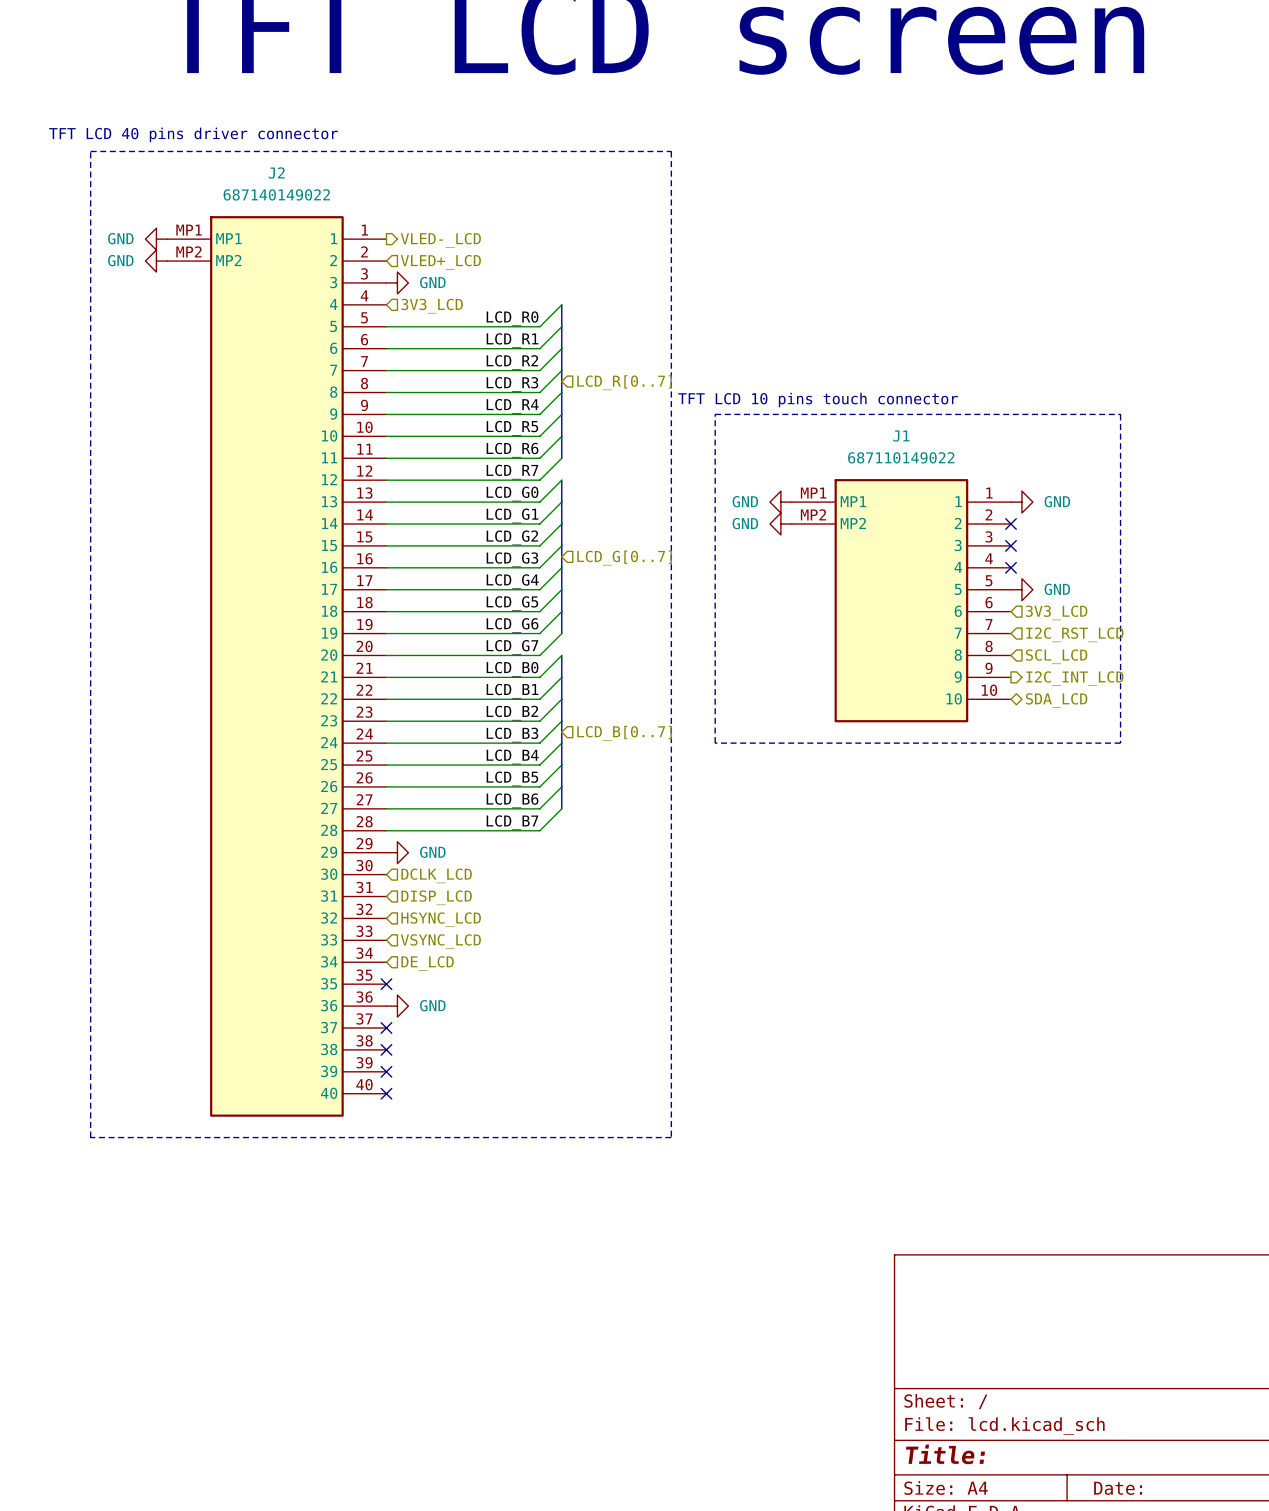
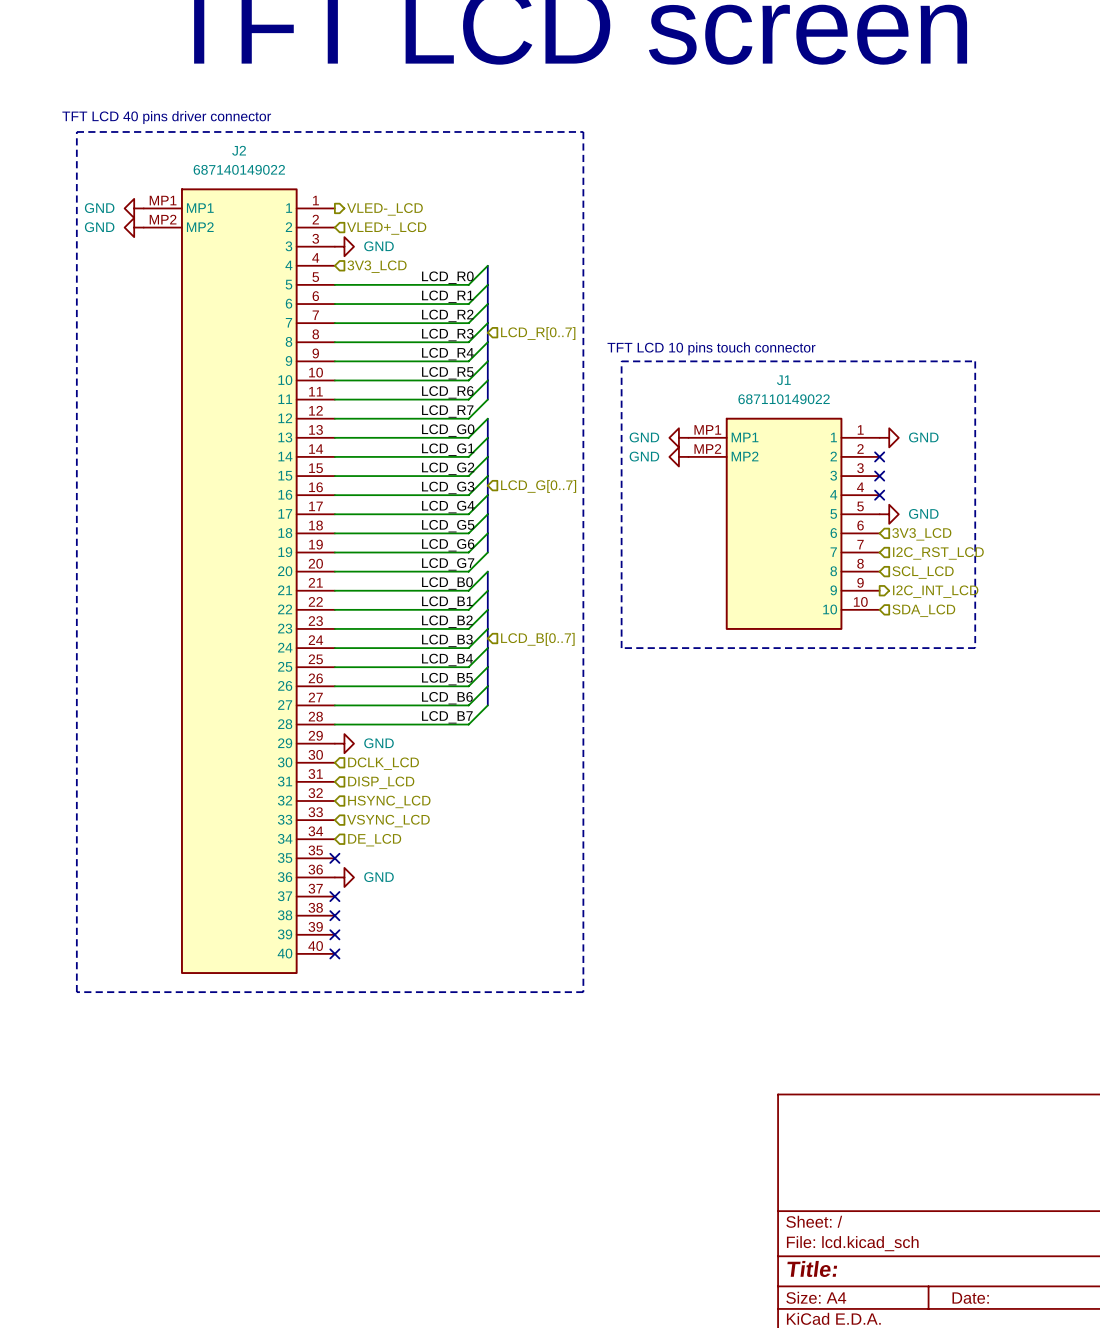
hierarchical label shape: bidirectional (1056, 700) -> input (923, 610)

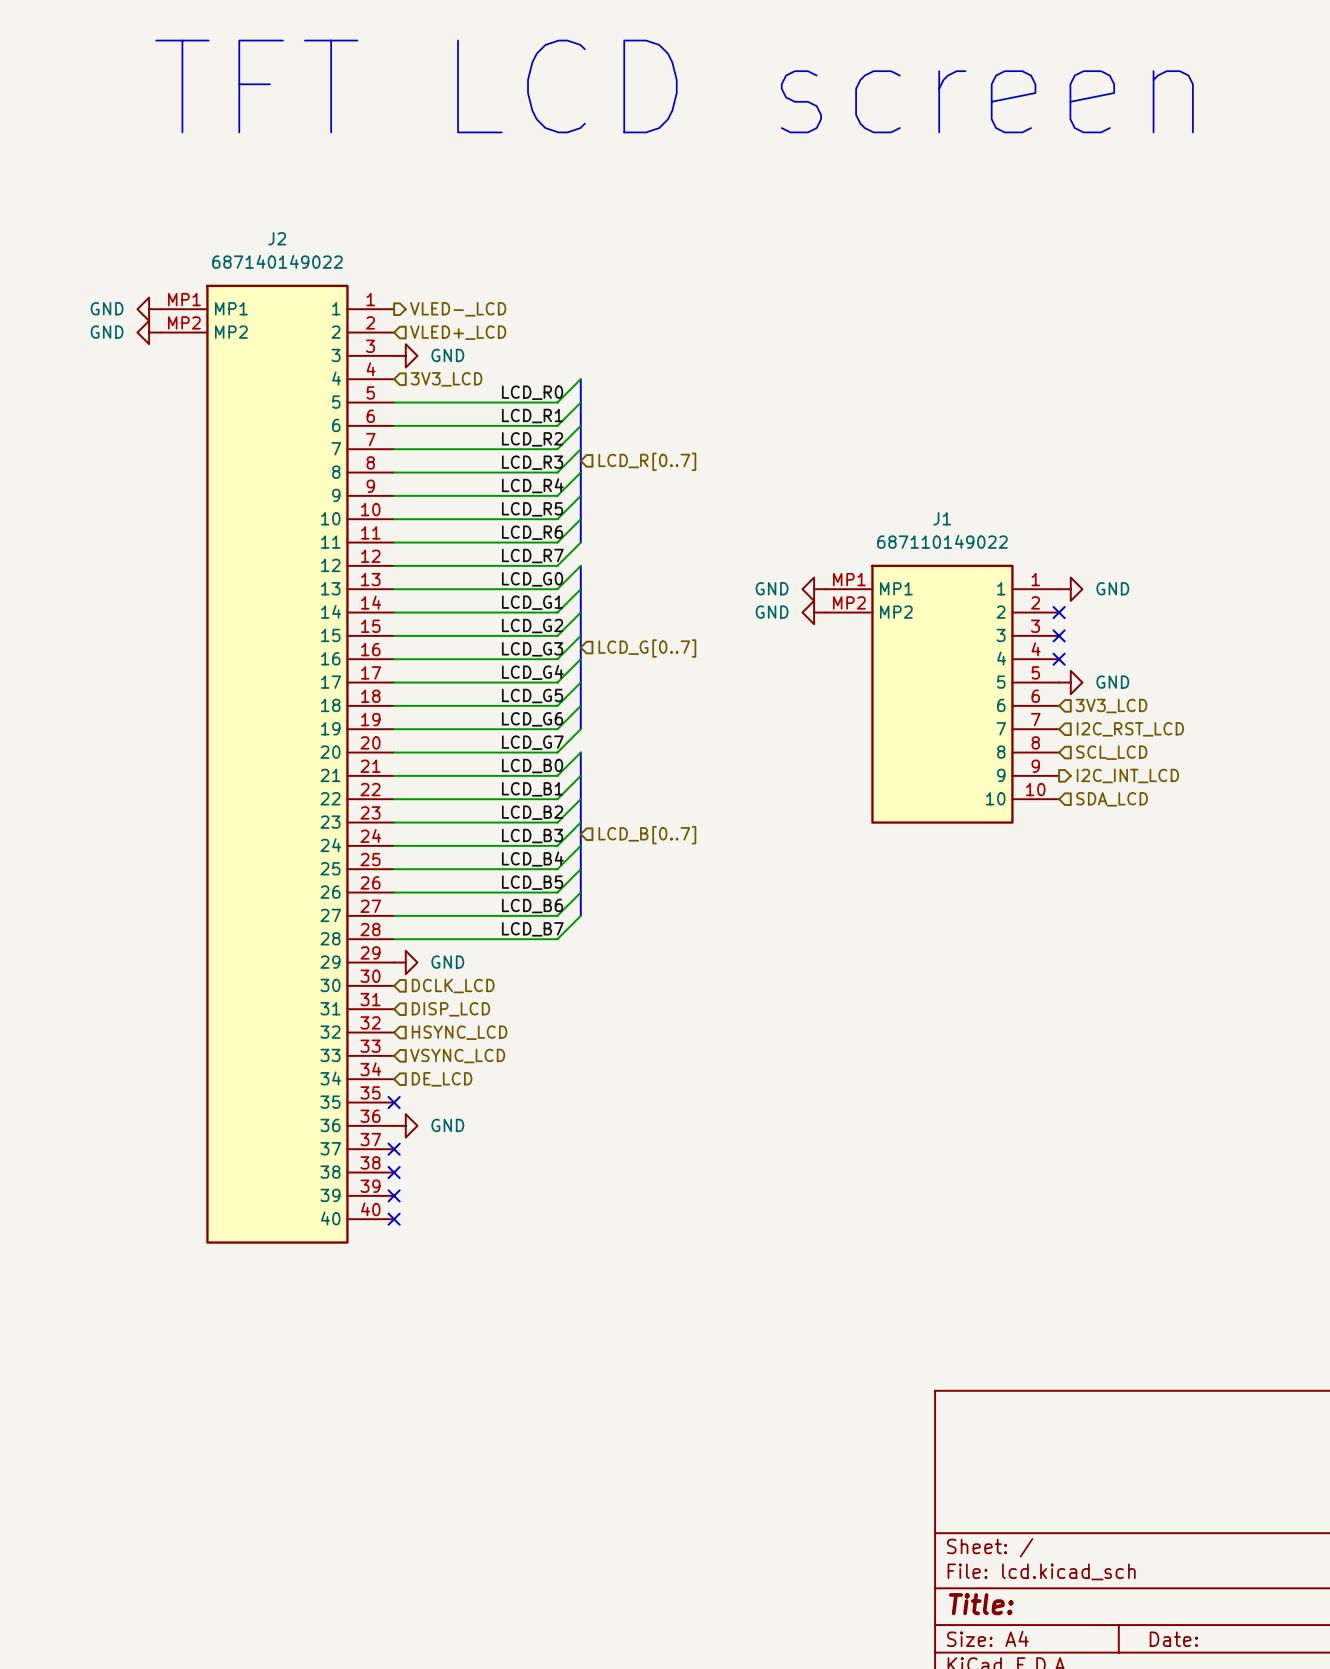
text: TFT LCD 40 pins driver connector (166, 117) -> none
line: (76, 131) (583, 131) (583, 992) (76, 992) (76, 131) -> none
text: TFT LCD 10 pins touch connector (711, 348) -> none
line: (621, 361) (975, 361) (975, 648) (621, 648) (621, 361) -> none

